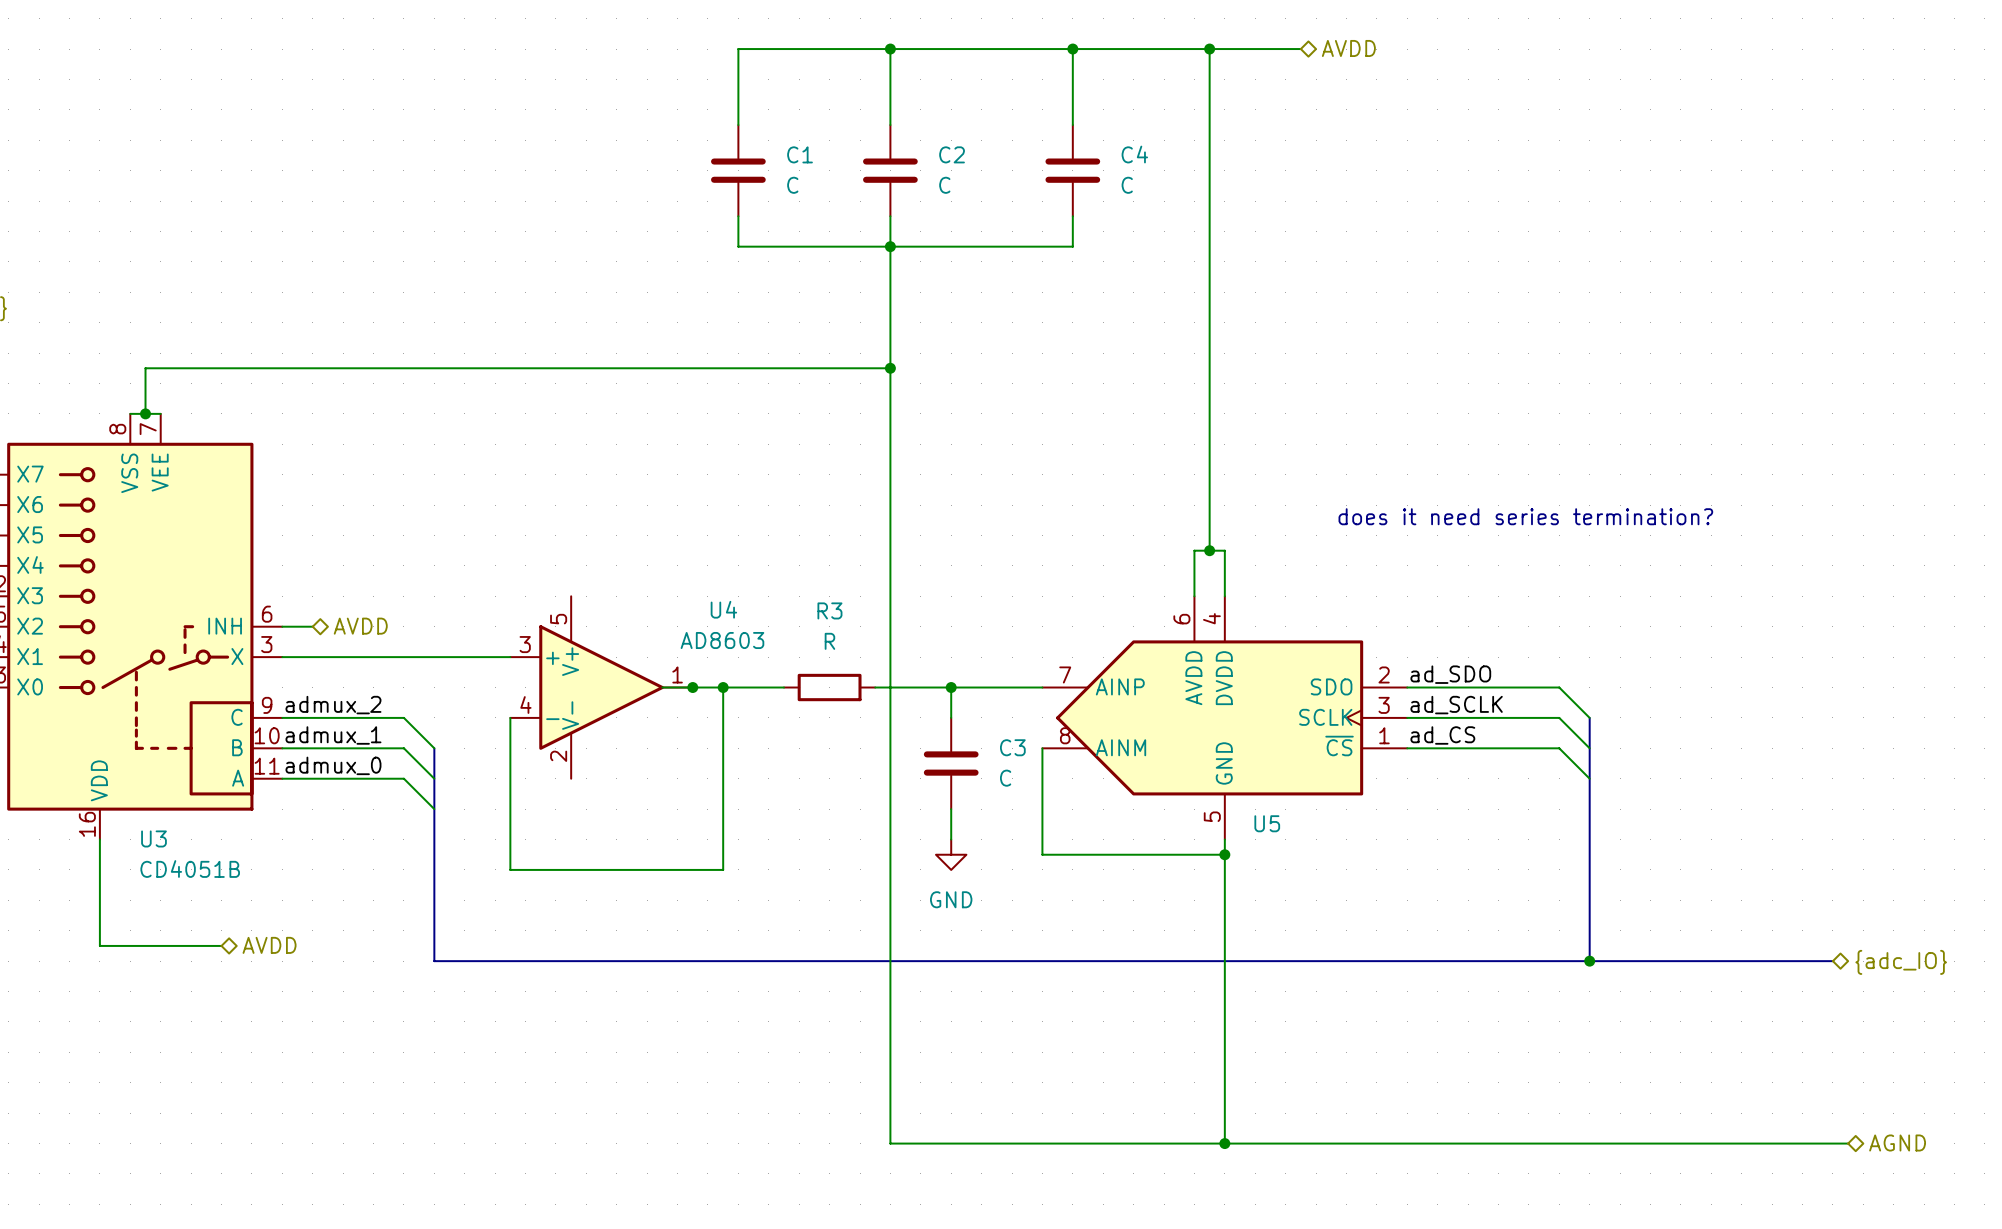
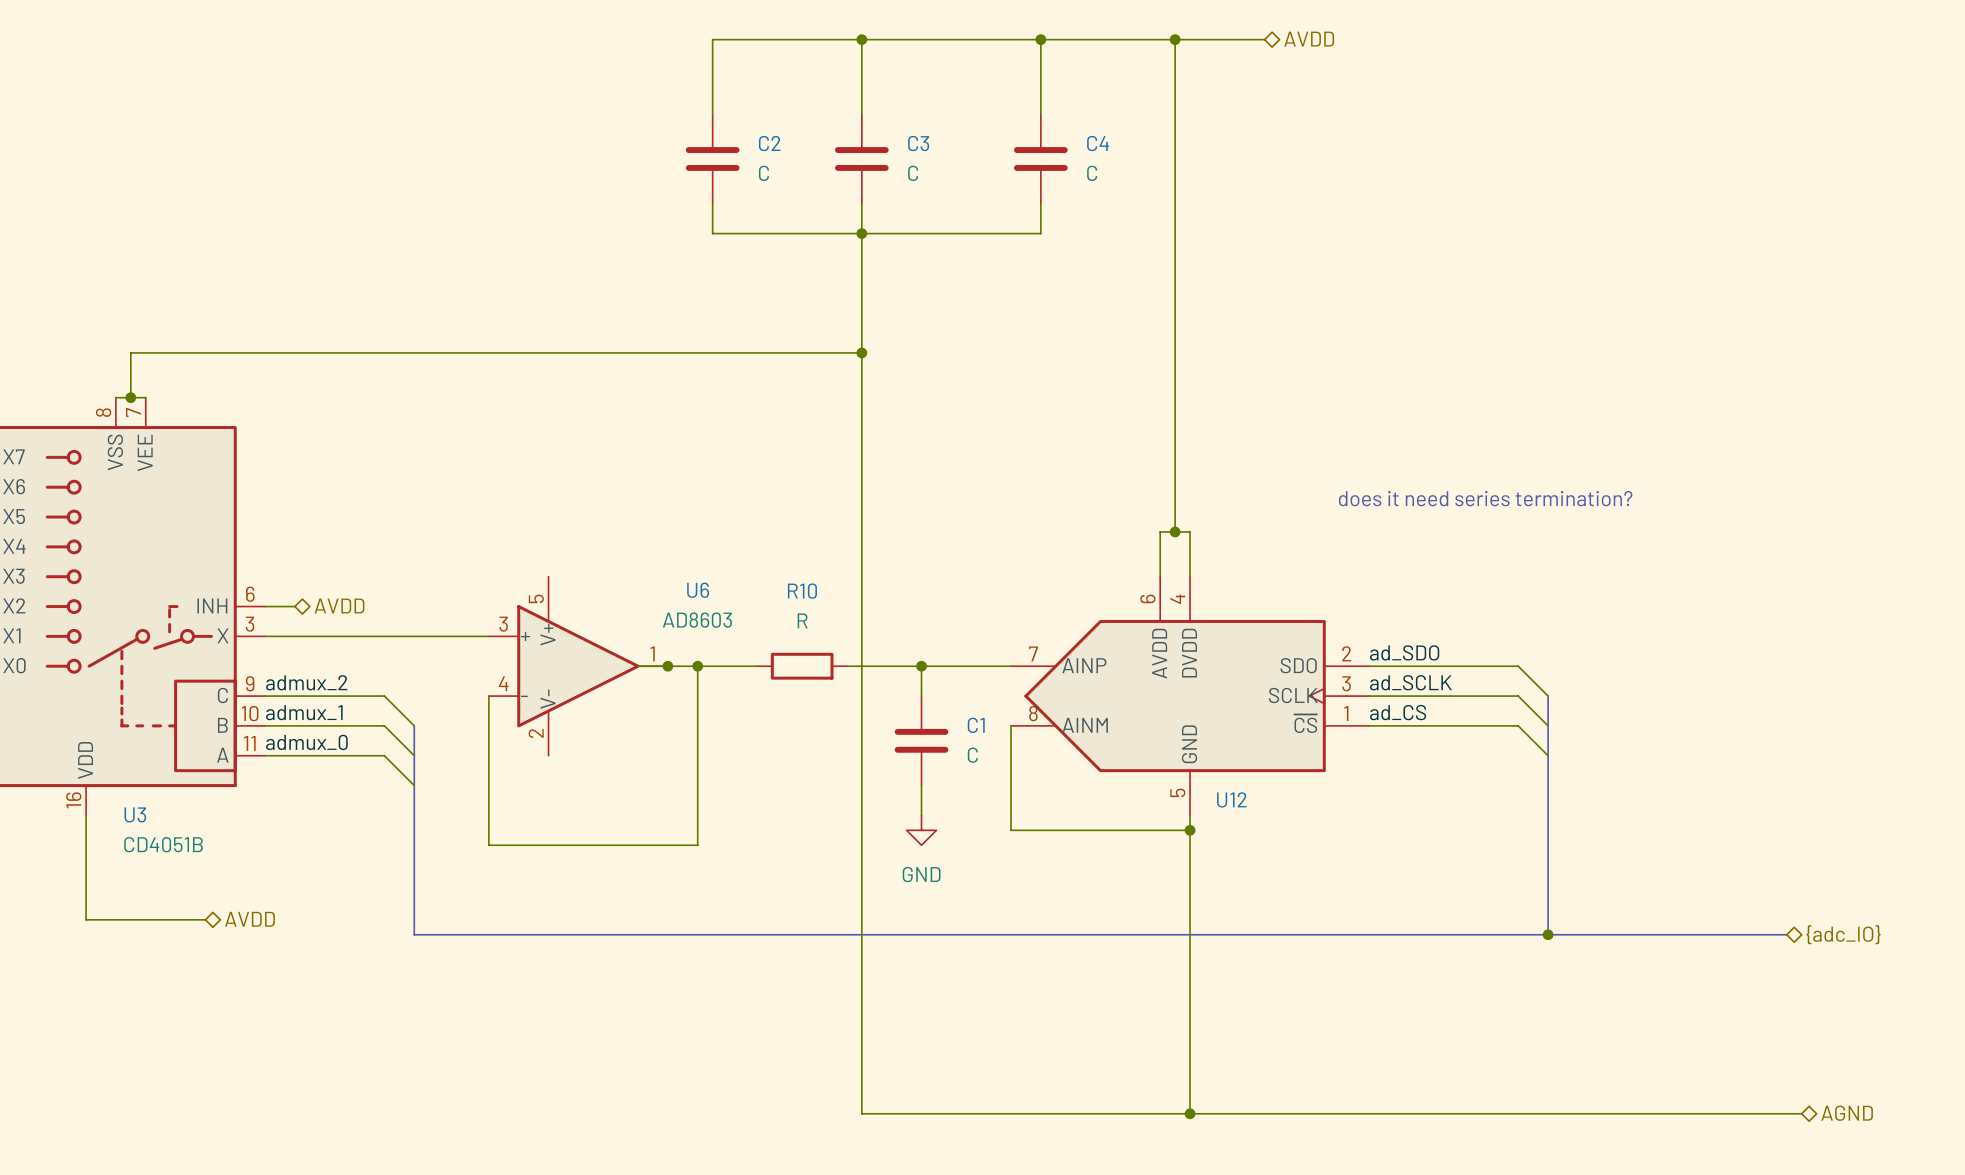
C1 name: C1 (800, 154) -> C2 (769, 143)
C2 name: C2 (952, 154) -> C3 (918, 143)
U4 name: U4 (723, 609) -> U6 (698, 590)
R3 name: R3 (829, 610) -> R10 (802, 591)
C3 name: C3 (1012, 747) -> C1 (976, 725)
U5 name: U5 (1267, 823) -> U12 (1231, 799)

